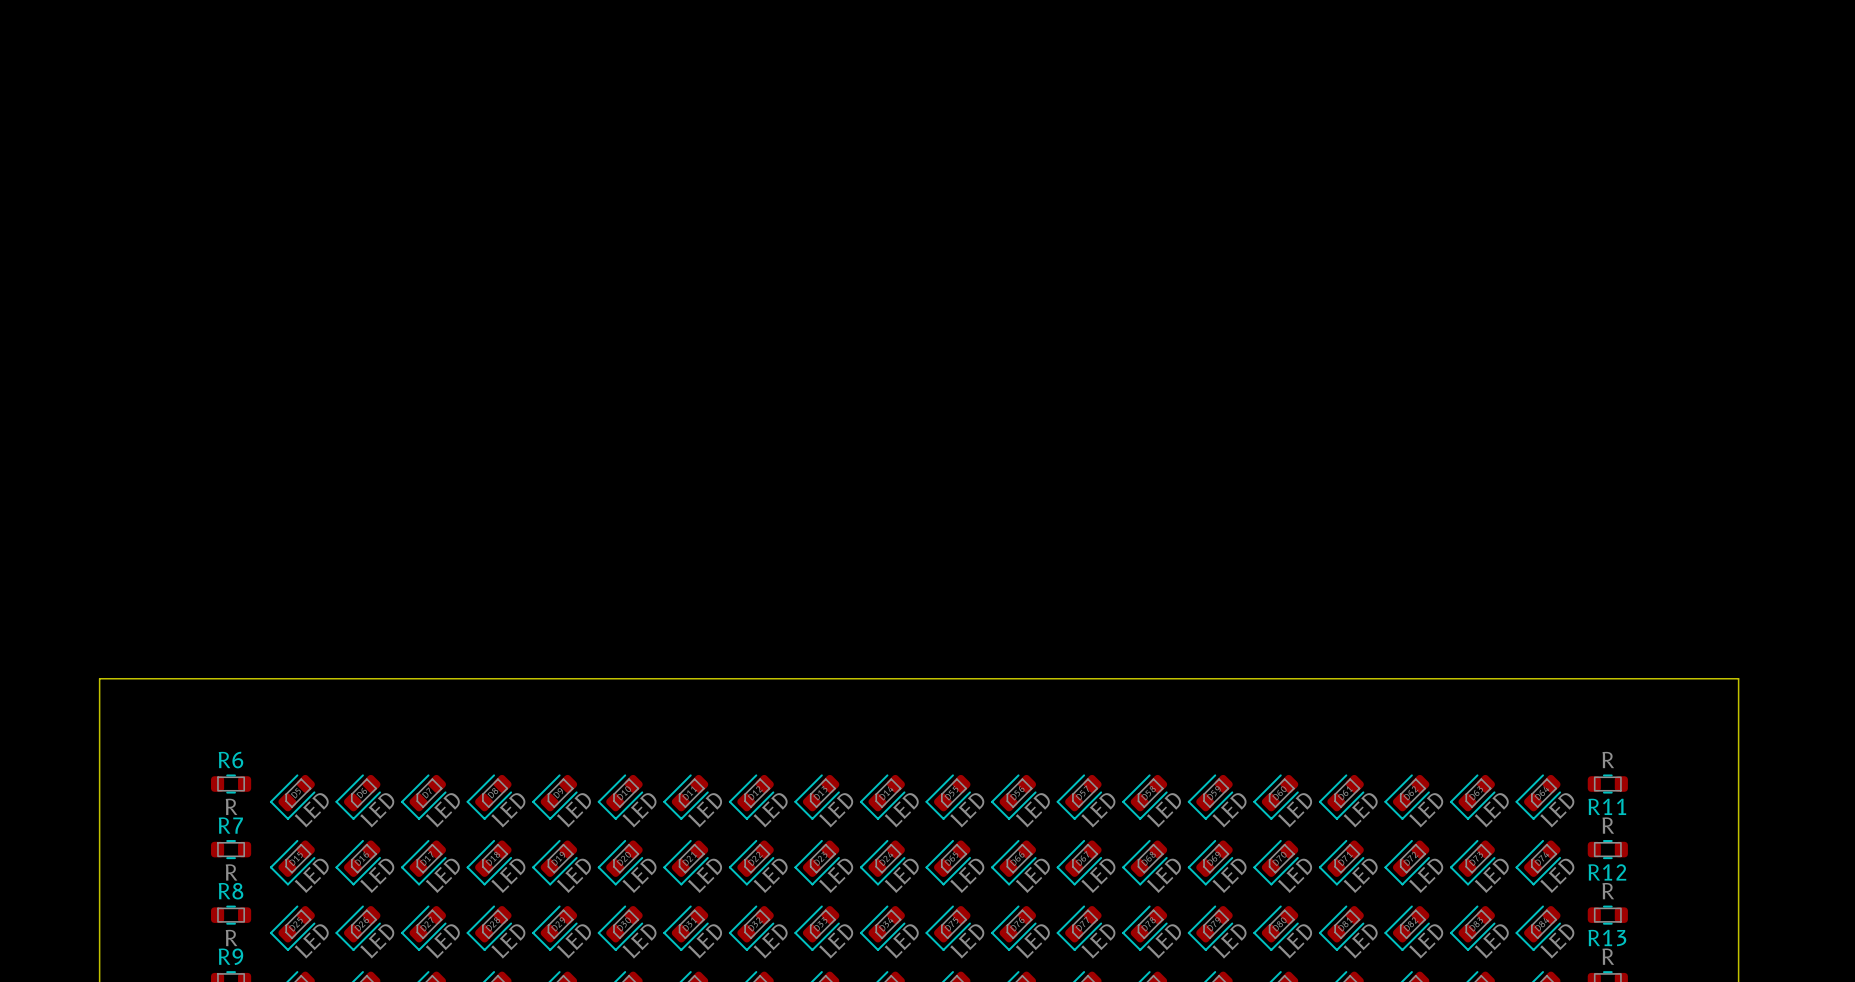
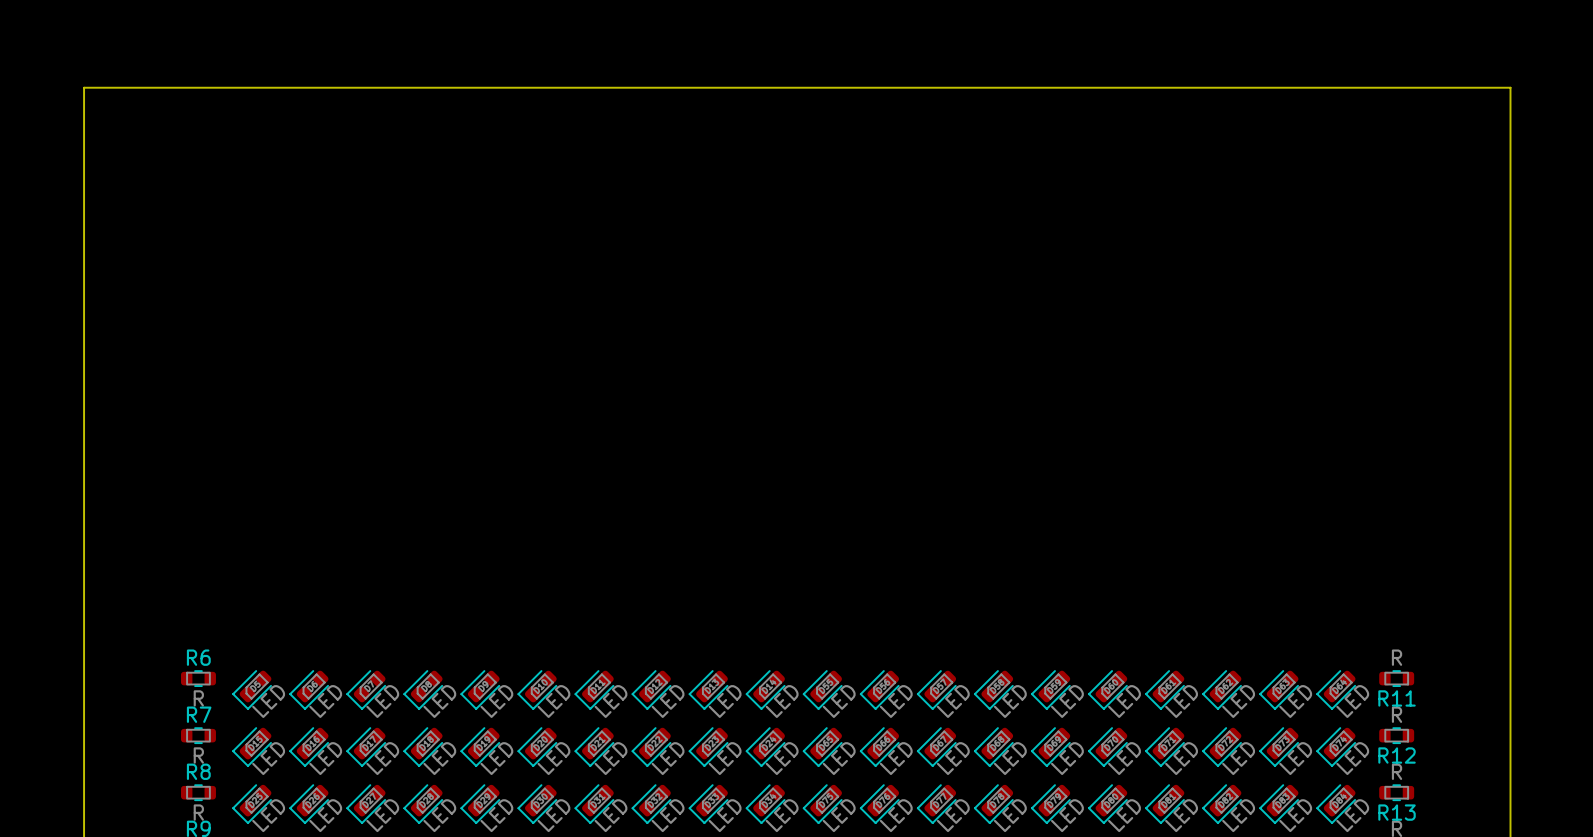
board edge: (99, 678) (1738, 678) -> (84, 586) (84, 87) (1510, 87) (1510, 586)

